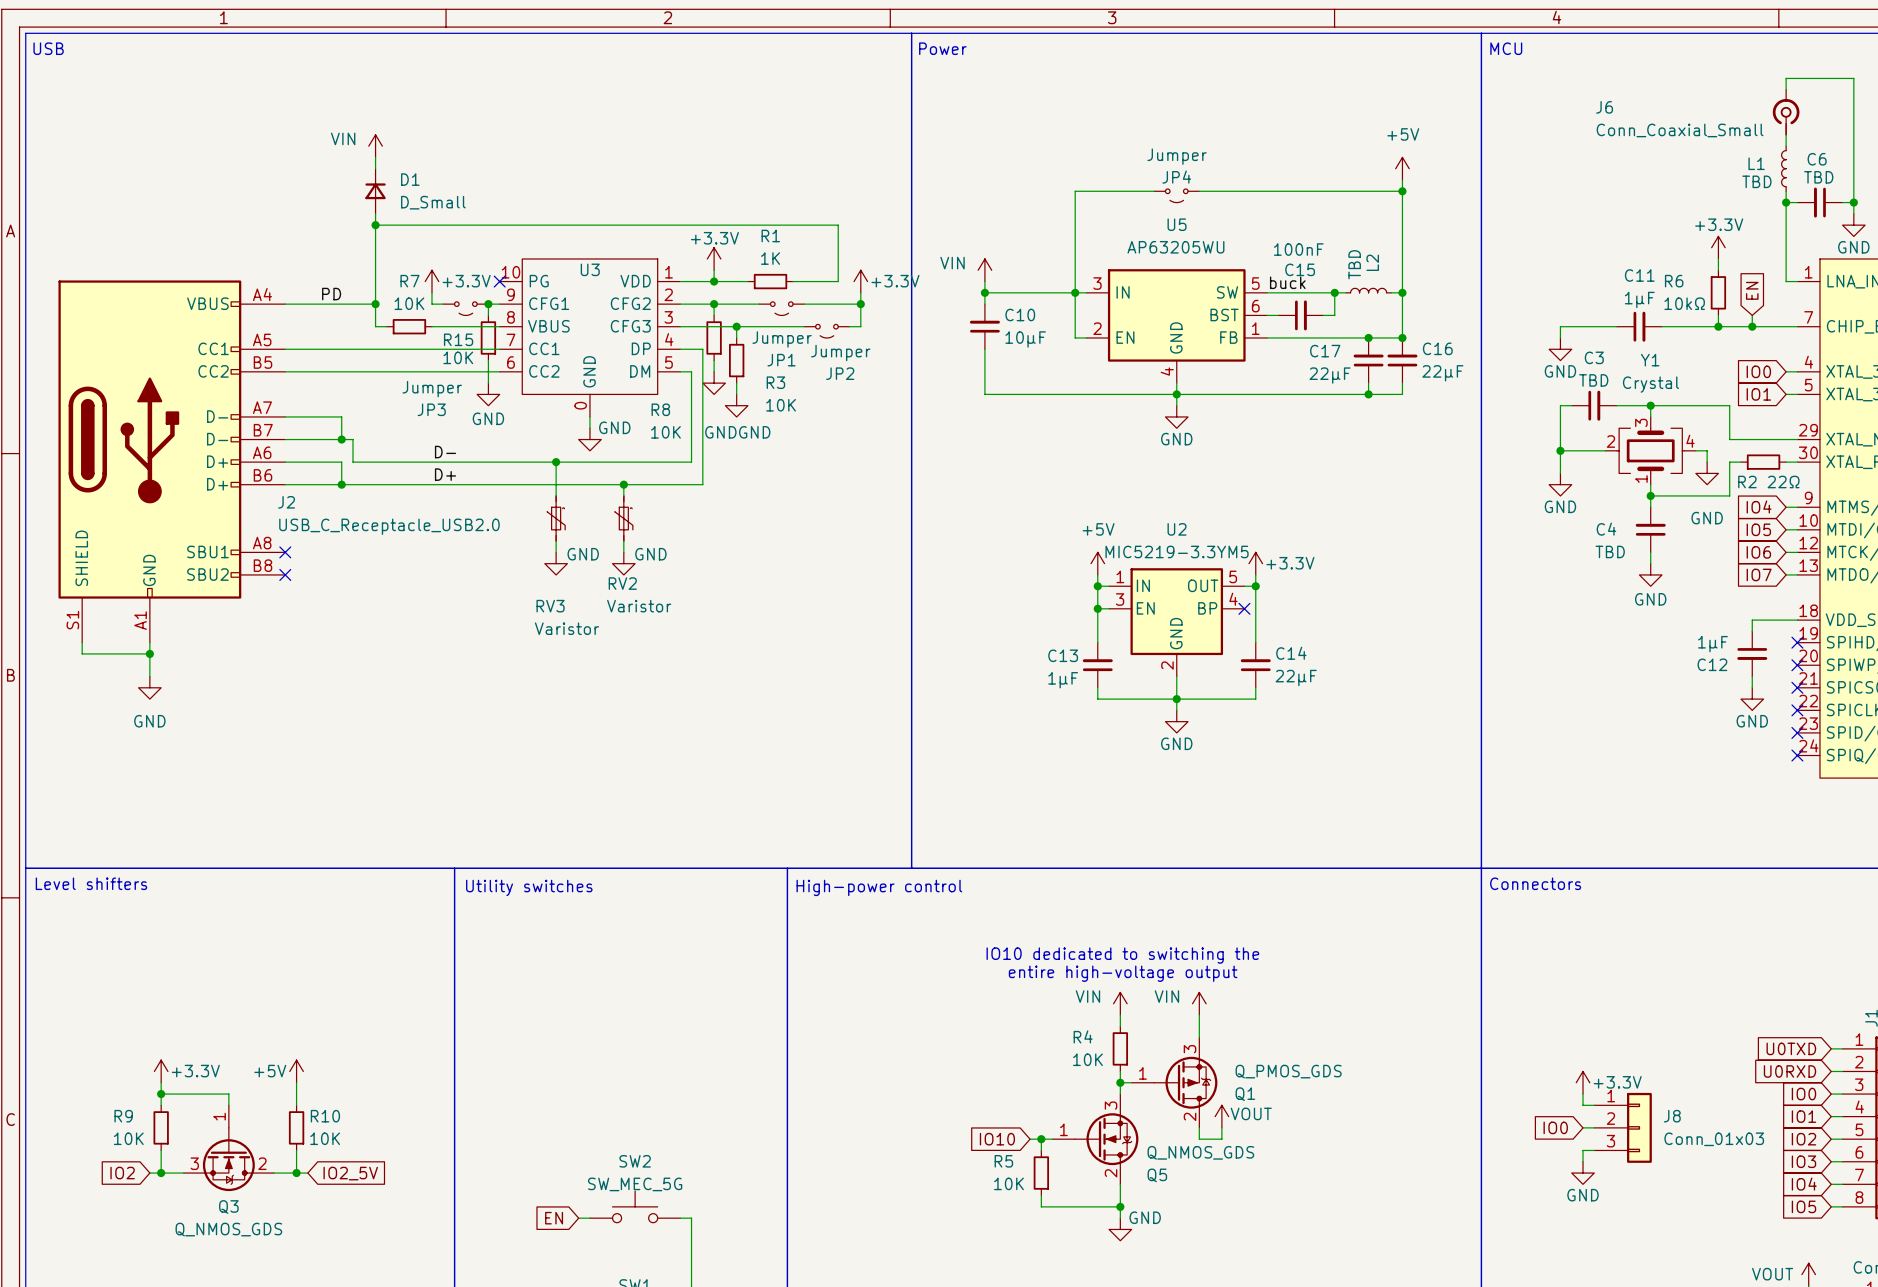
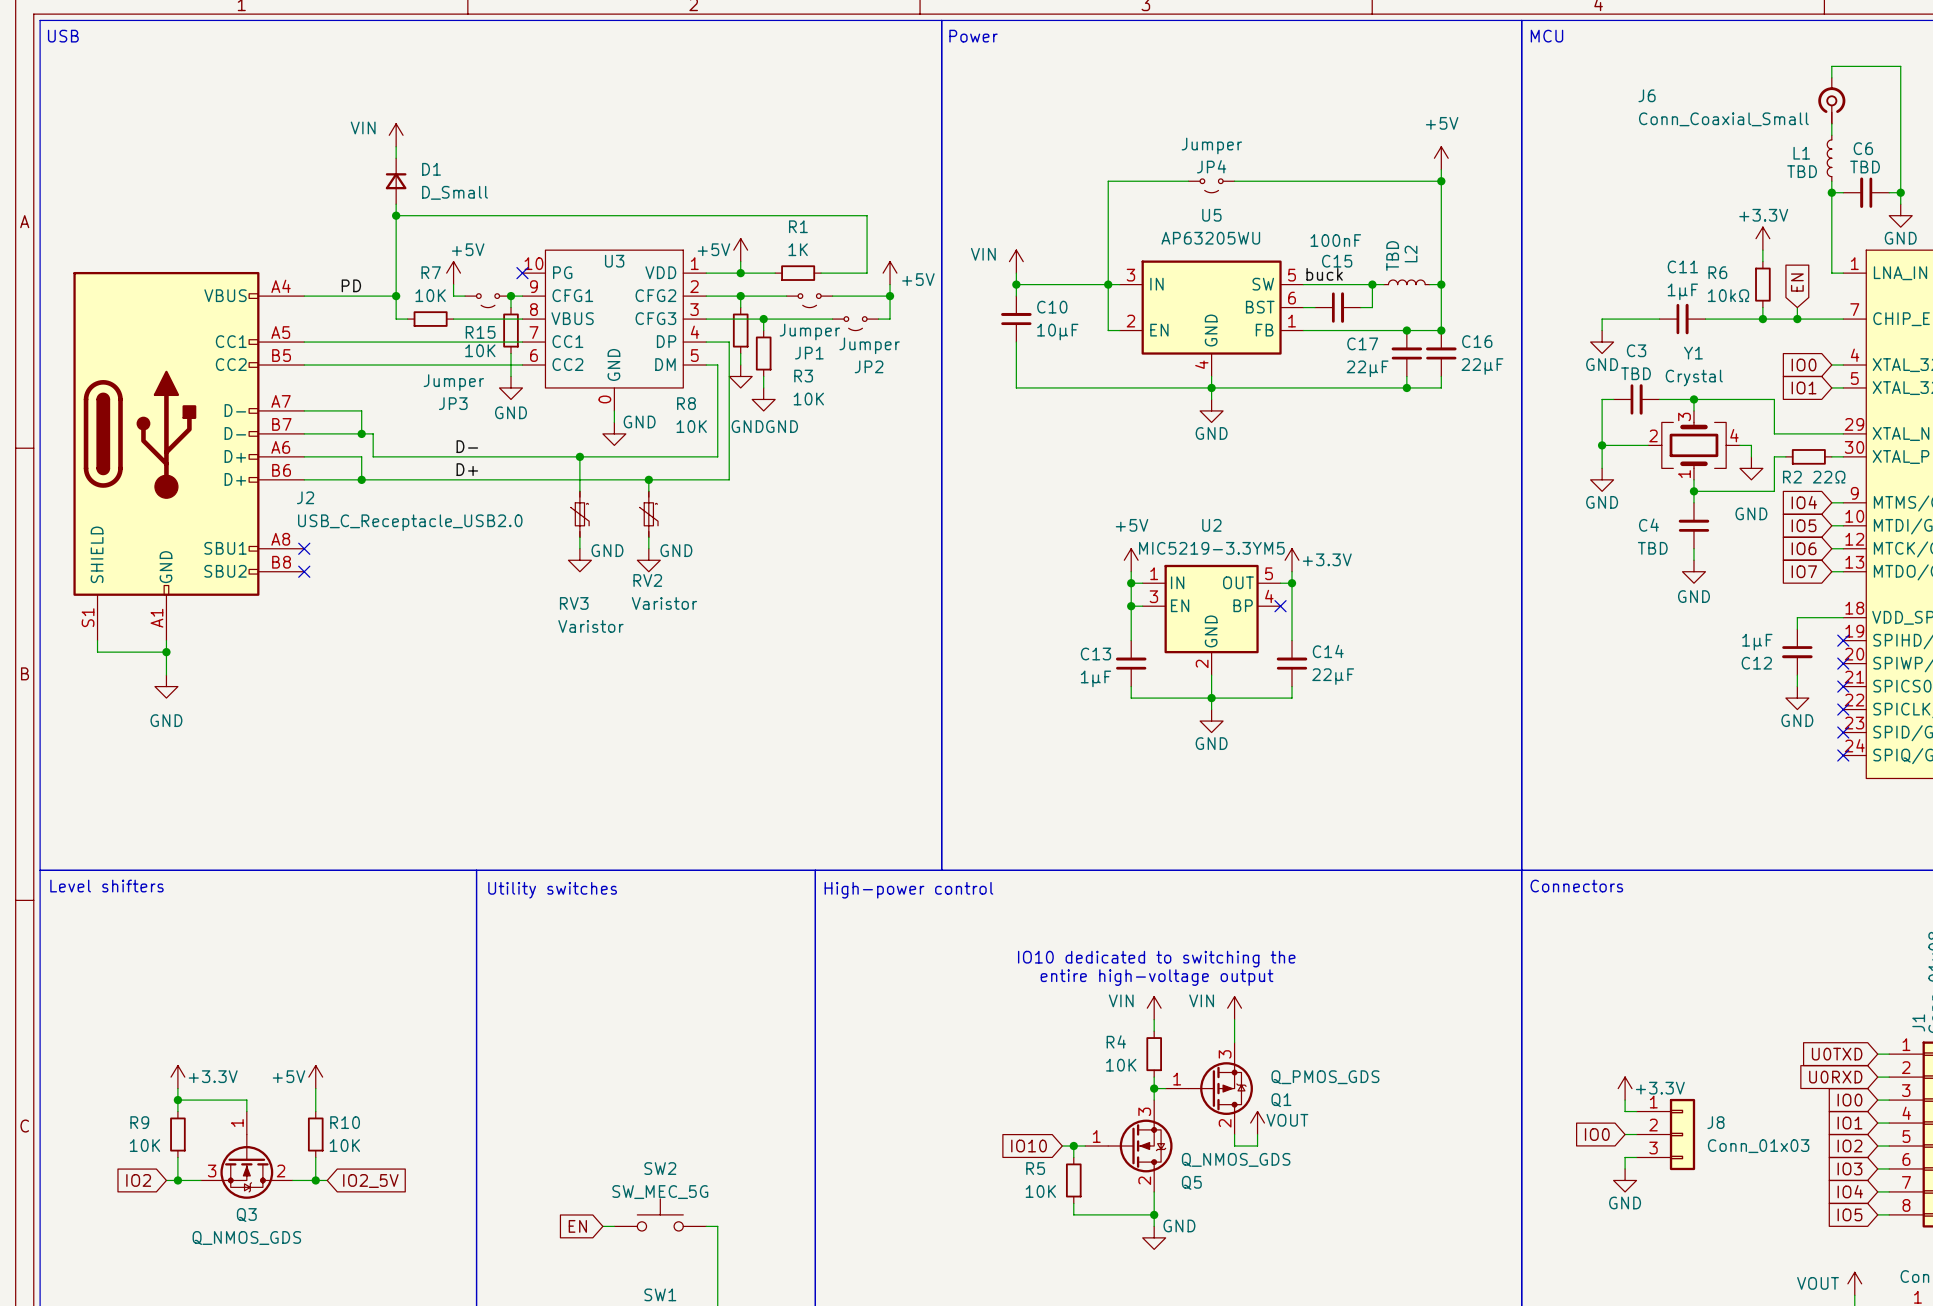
power symbol: +3.3V (714, 258) -> +5V (740, 250)
power symbol: +3.3V (431, 281) -> +5V (453, 273)
power symbol: +3.3V (860, 281) -> +5V (890, 273)

